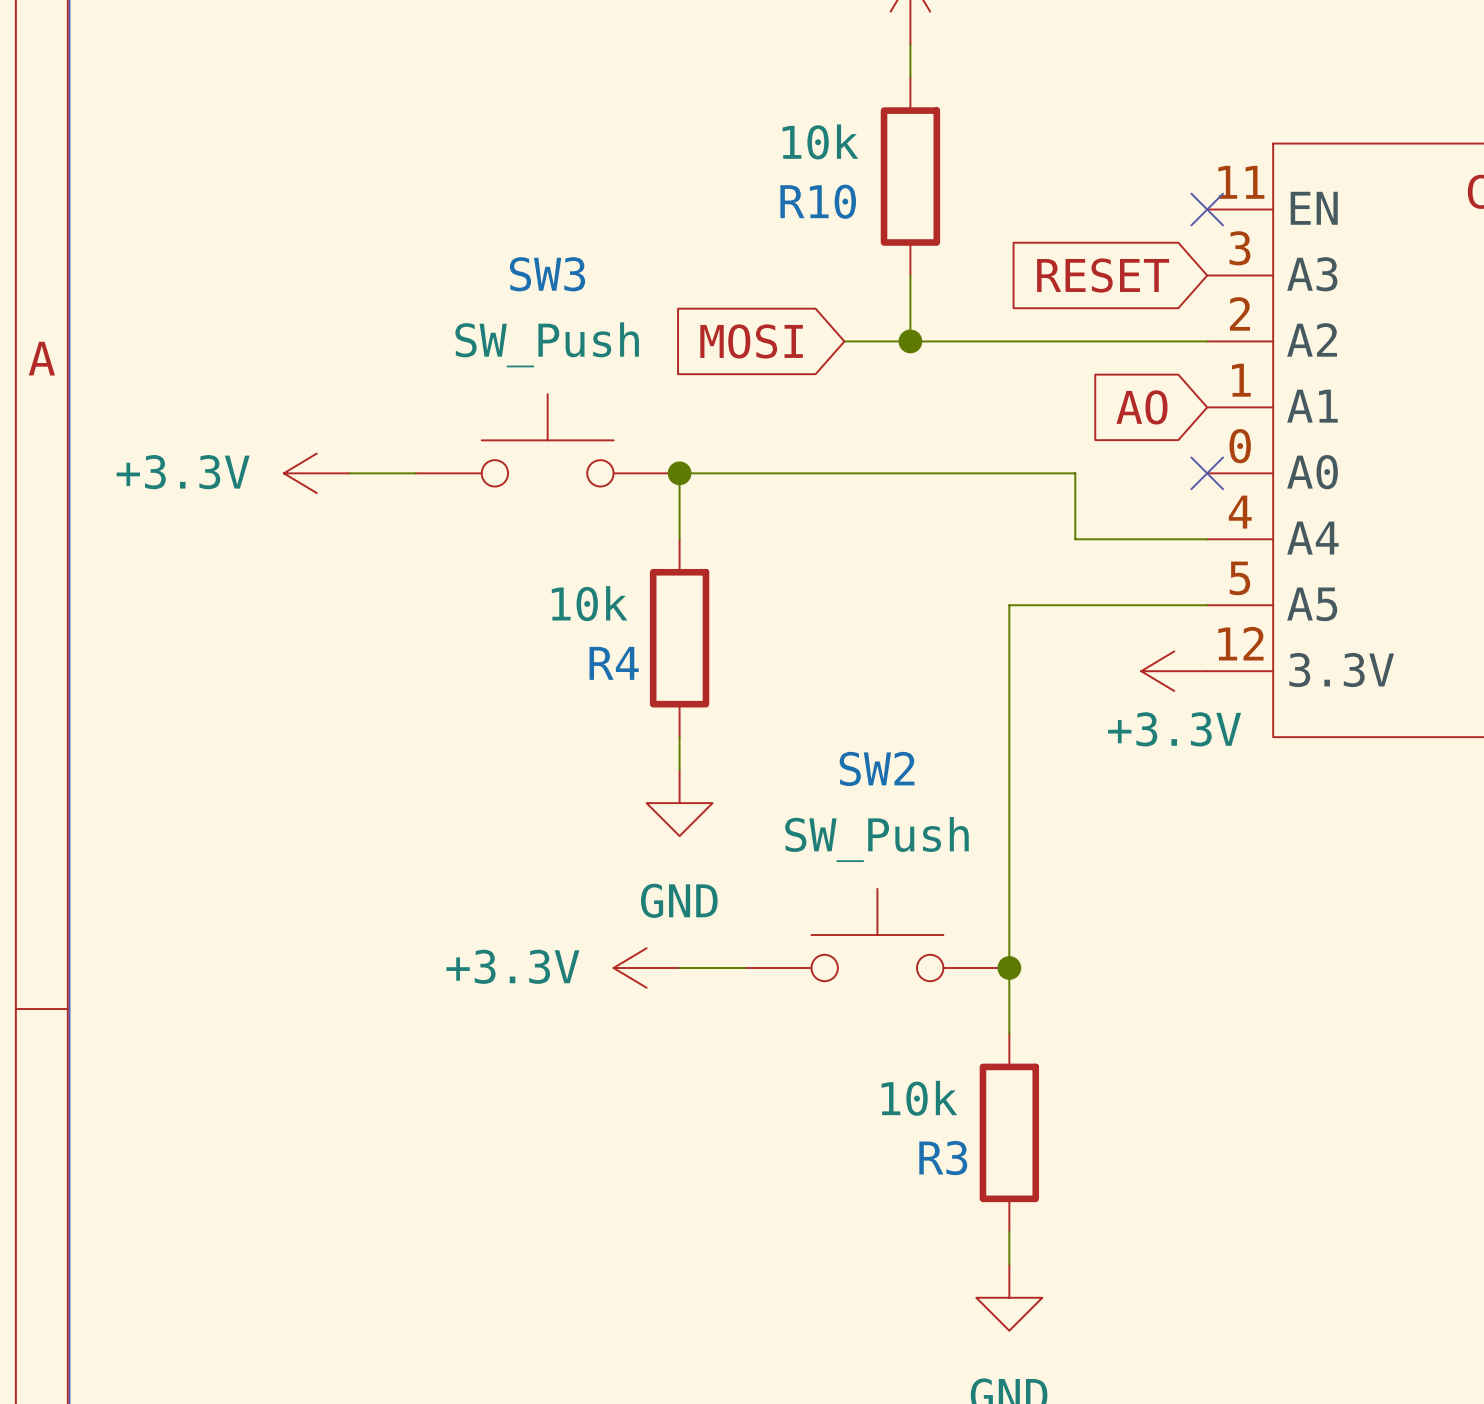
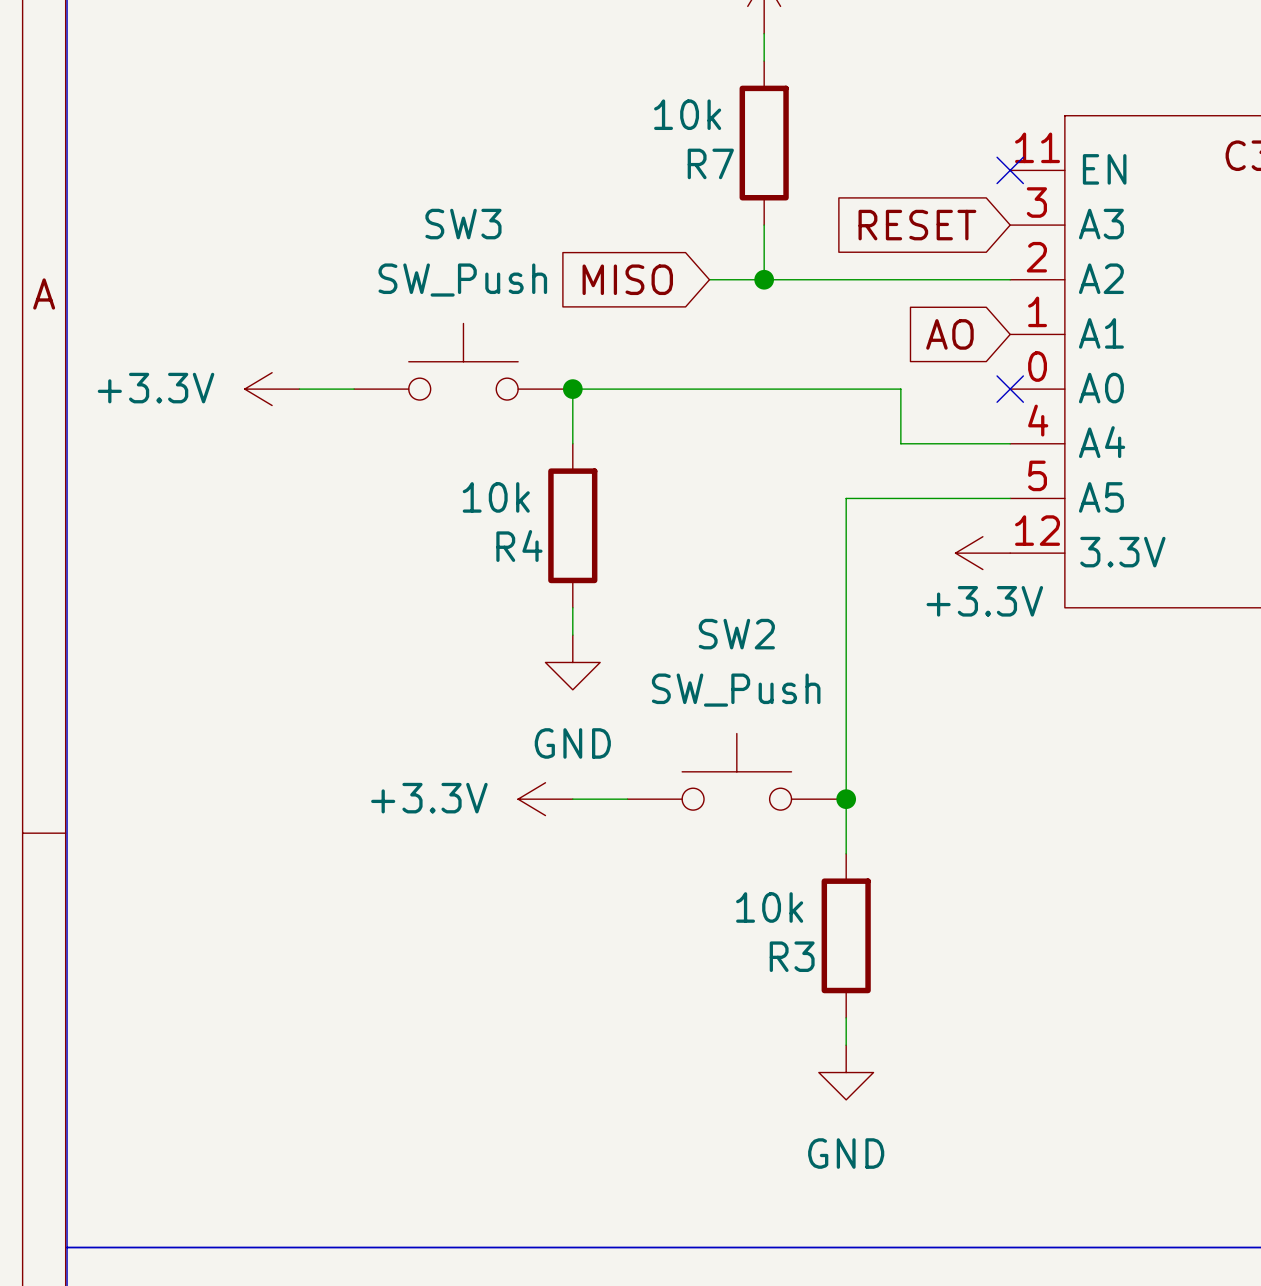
R10 name: R10 (818, 201) -> R7 (710, 163)
global label: MOSI (751, 341) -> MISO (627, 279)

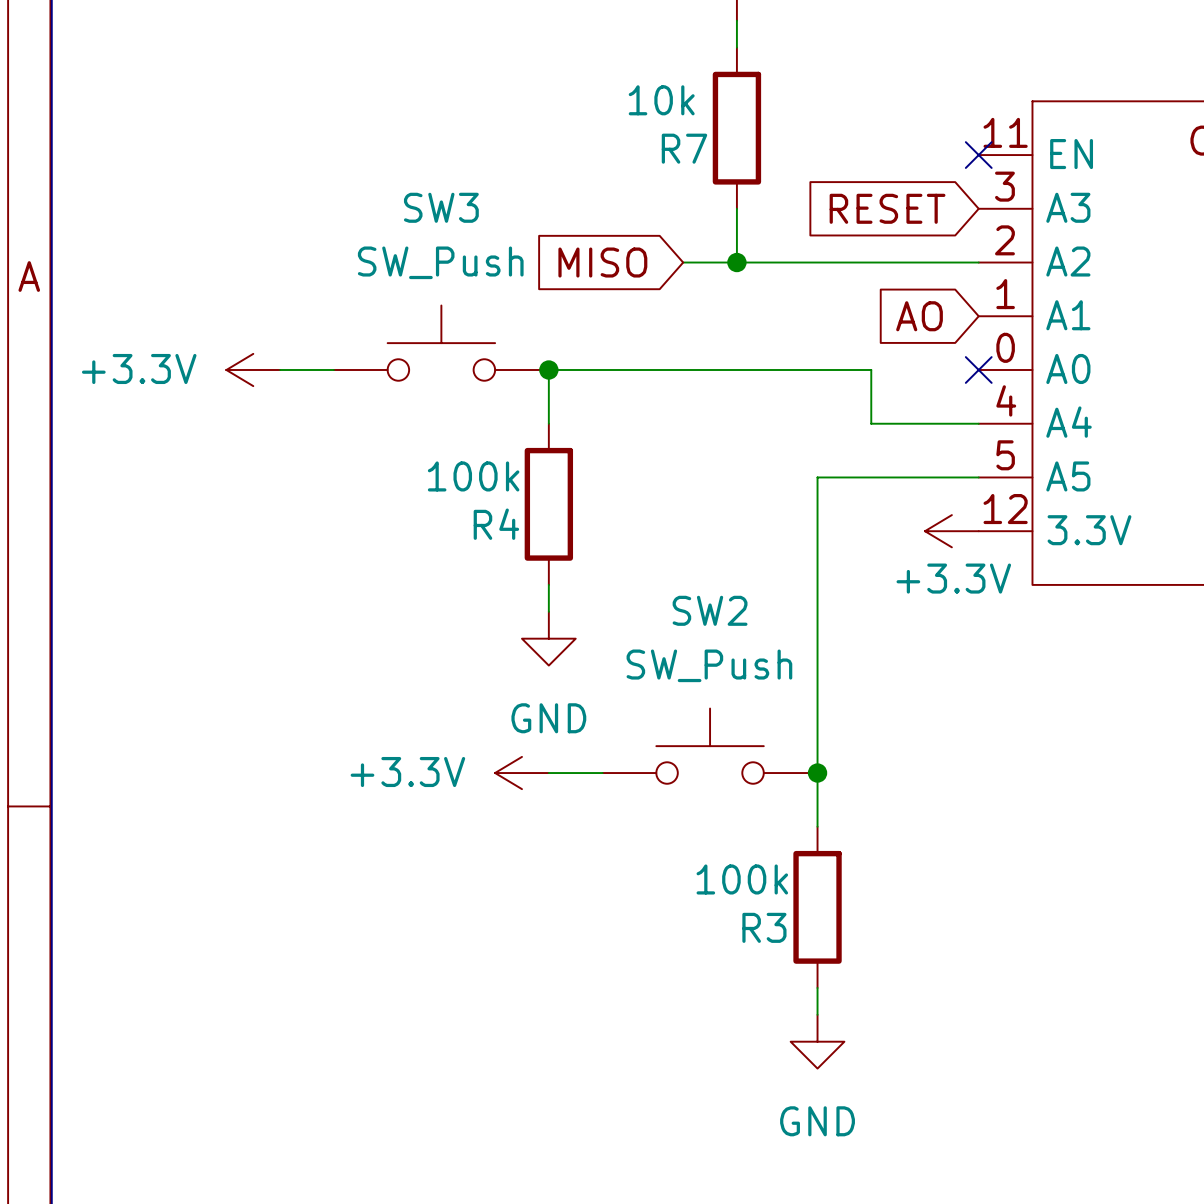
R4 value: 10k (496, 497) -> 100k (473, 476)
R3 value: 10k (769, 907) -> 100k (742, 879)

